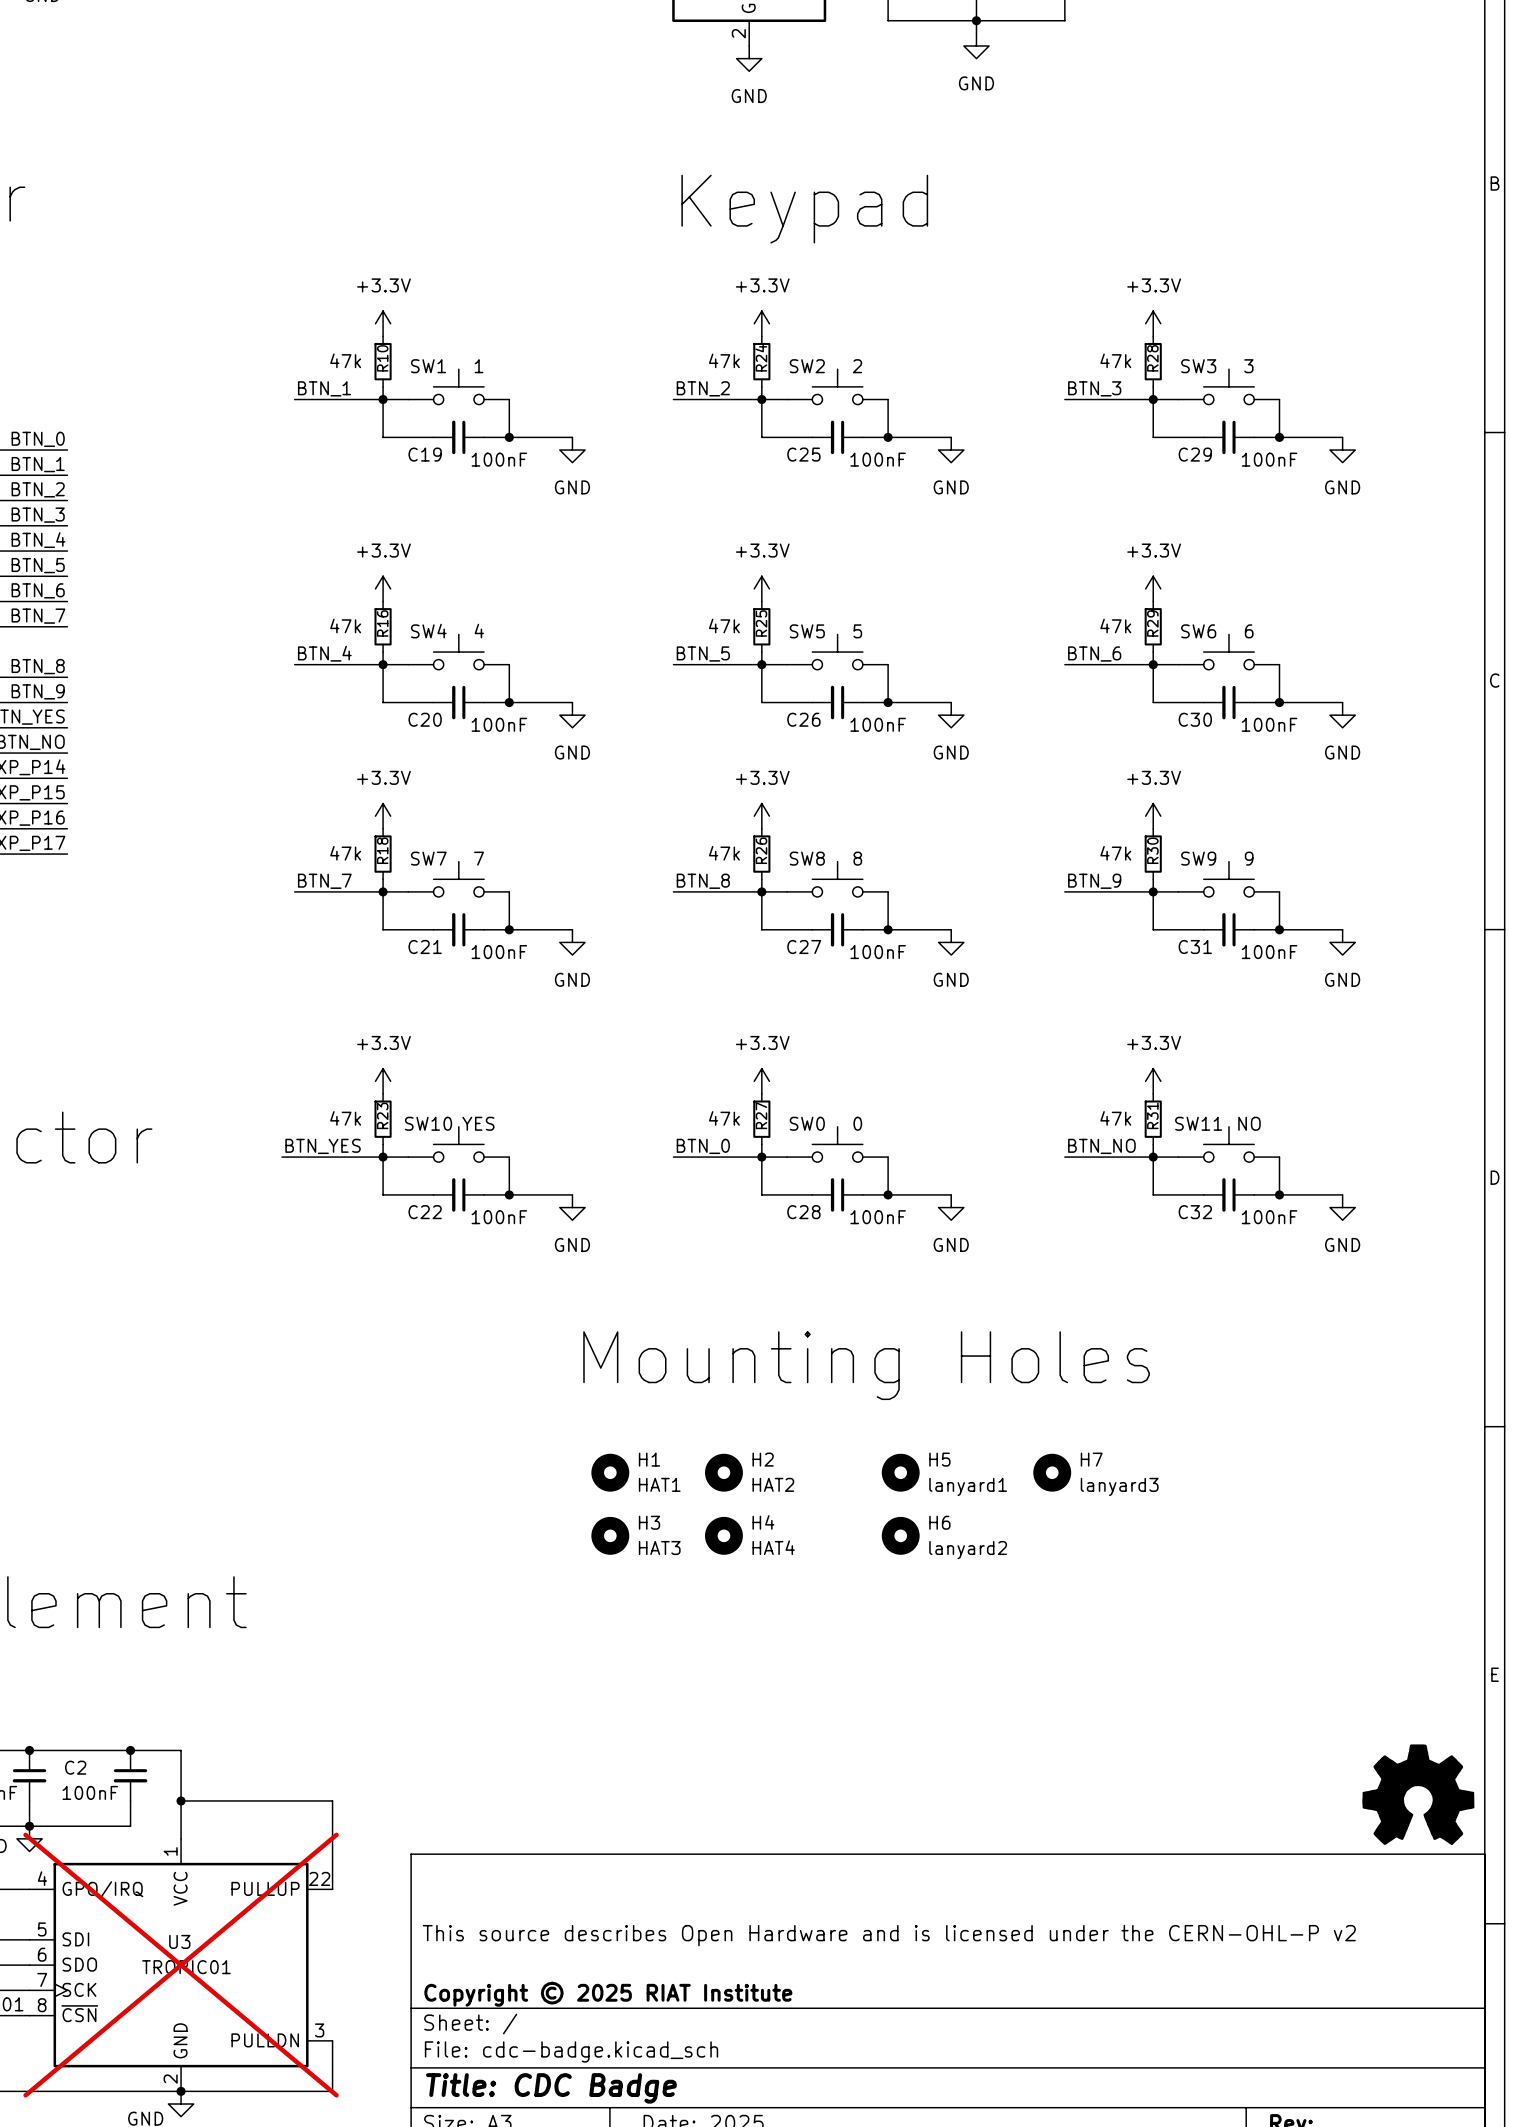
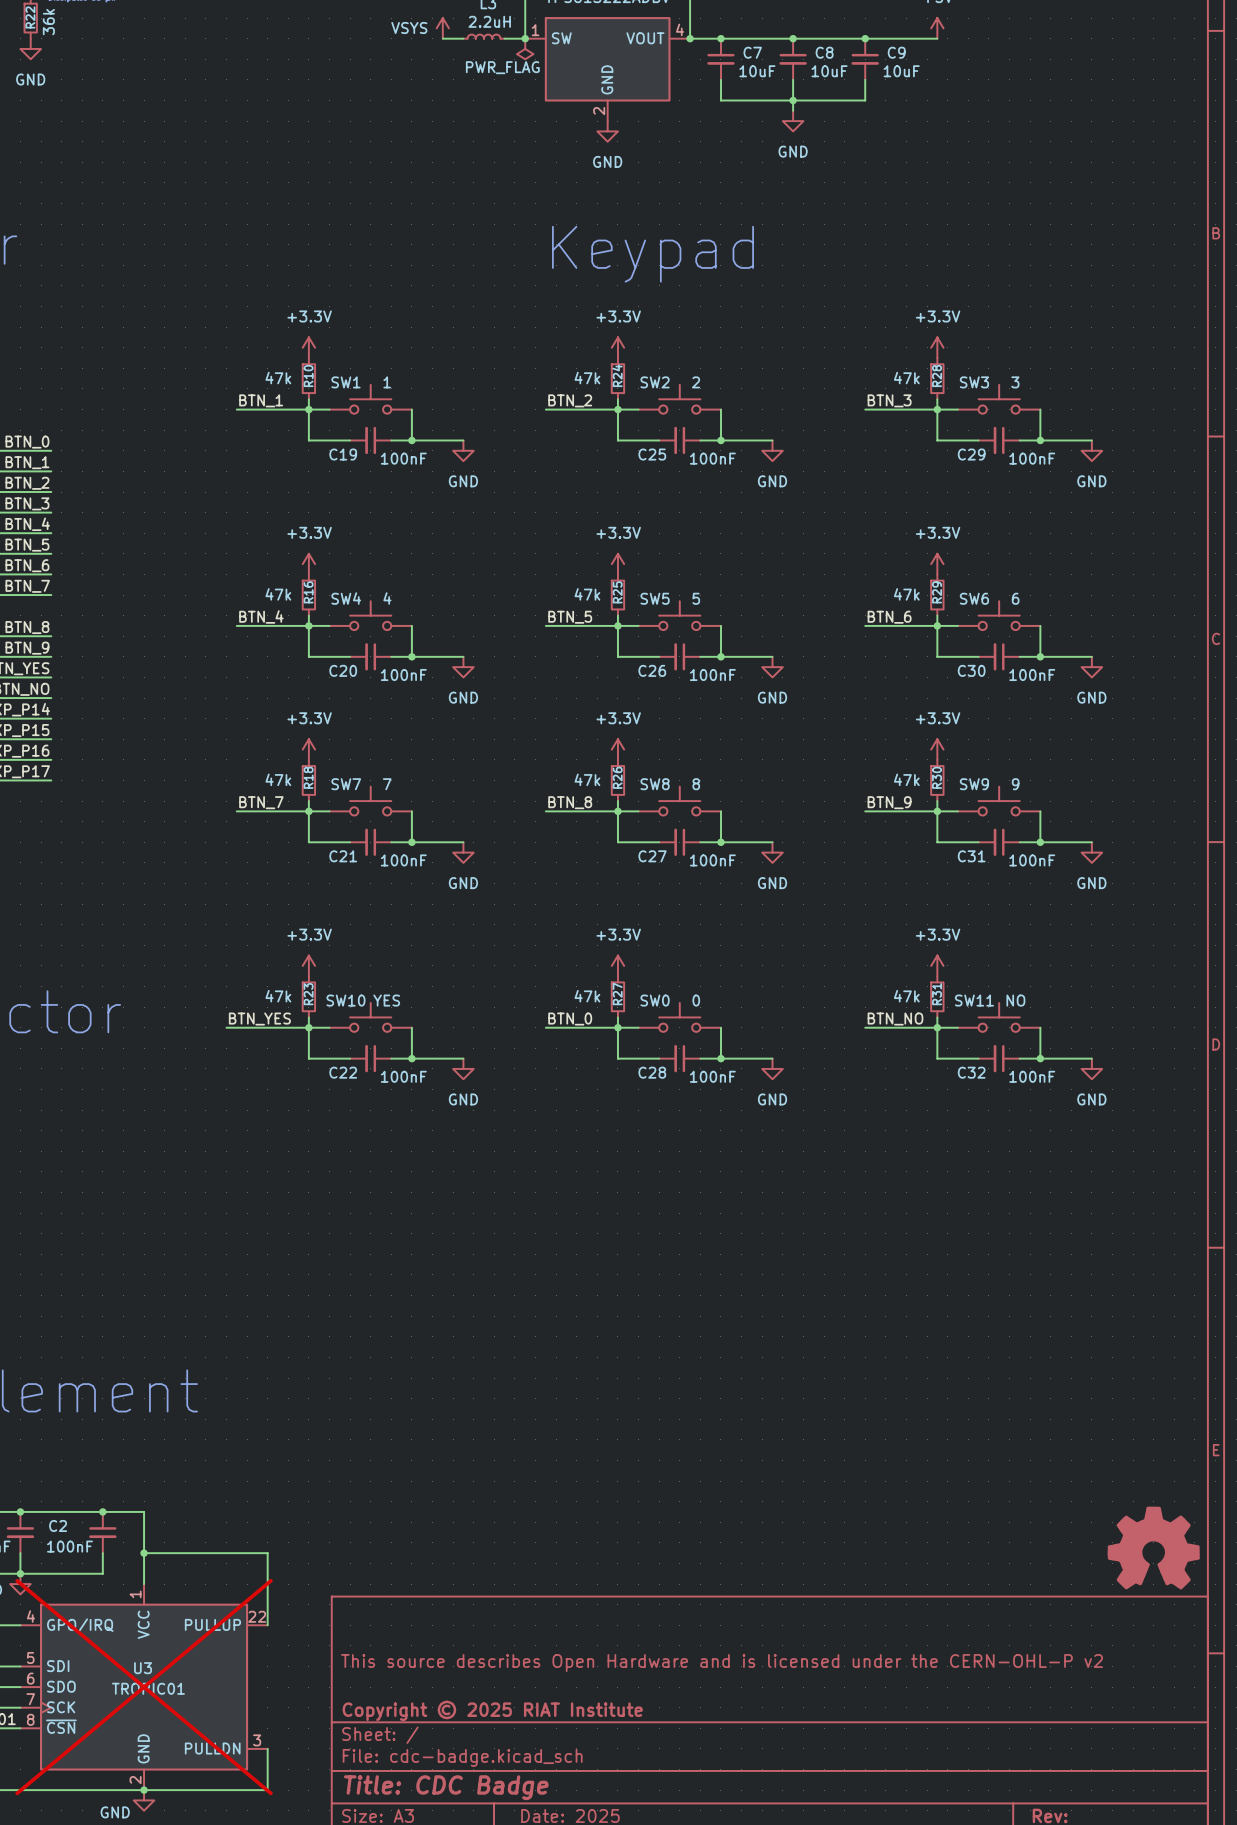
text: Mounting Holes (866, 1365) -> none
H1: HAT1 (610, 1472) -> none
H2: HAT2 (723, 1472) -> none
H5: lanyard1 (900, 1472) -> none
H7: lanyard3 (1052, 1472) -> none
H3: HAT3 (610, 1535) -> none
H4: HAT4 (723, 1535) -> none
H6: lanyard2 (900, 1535) -> none

